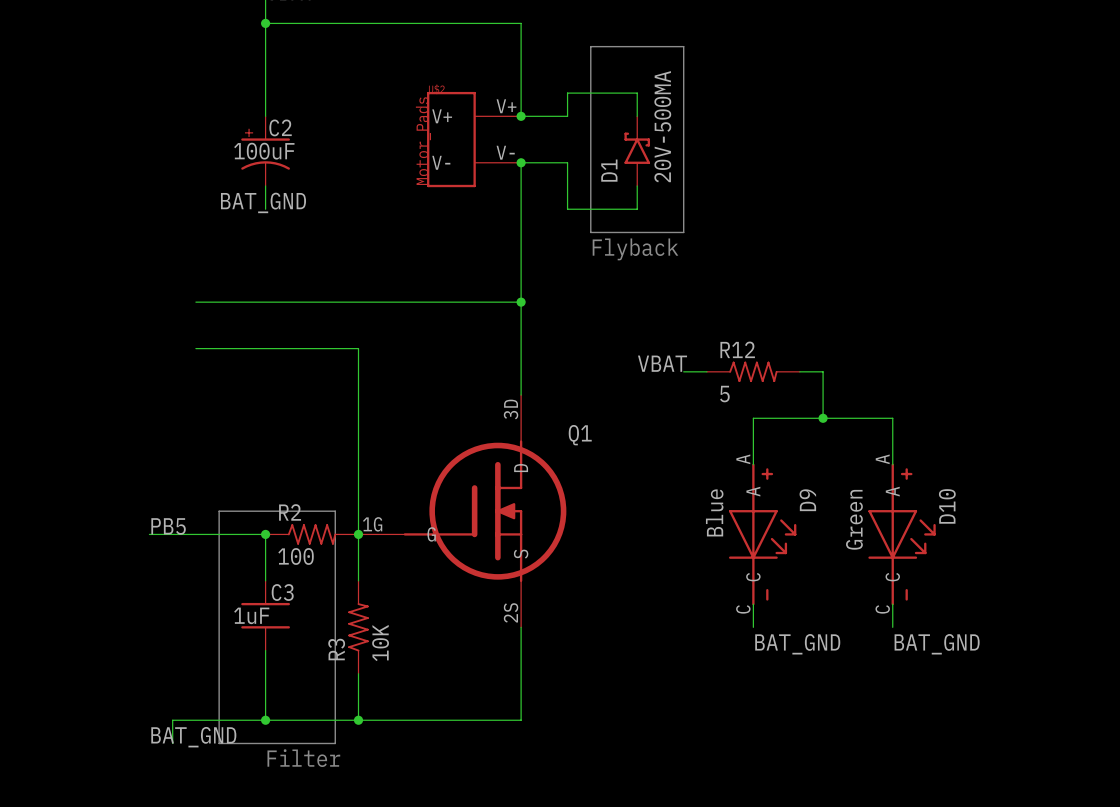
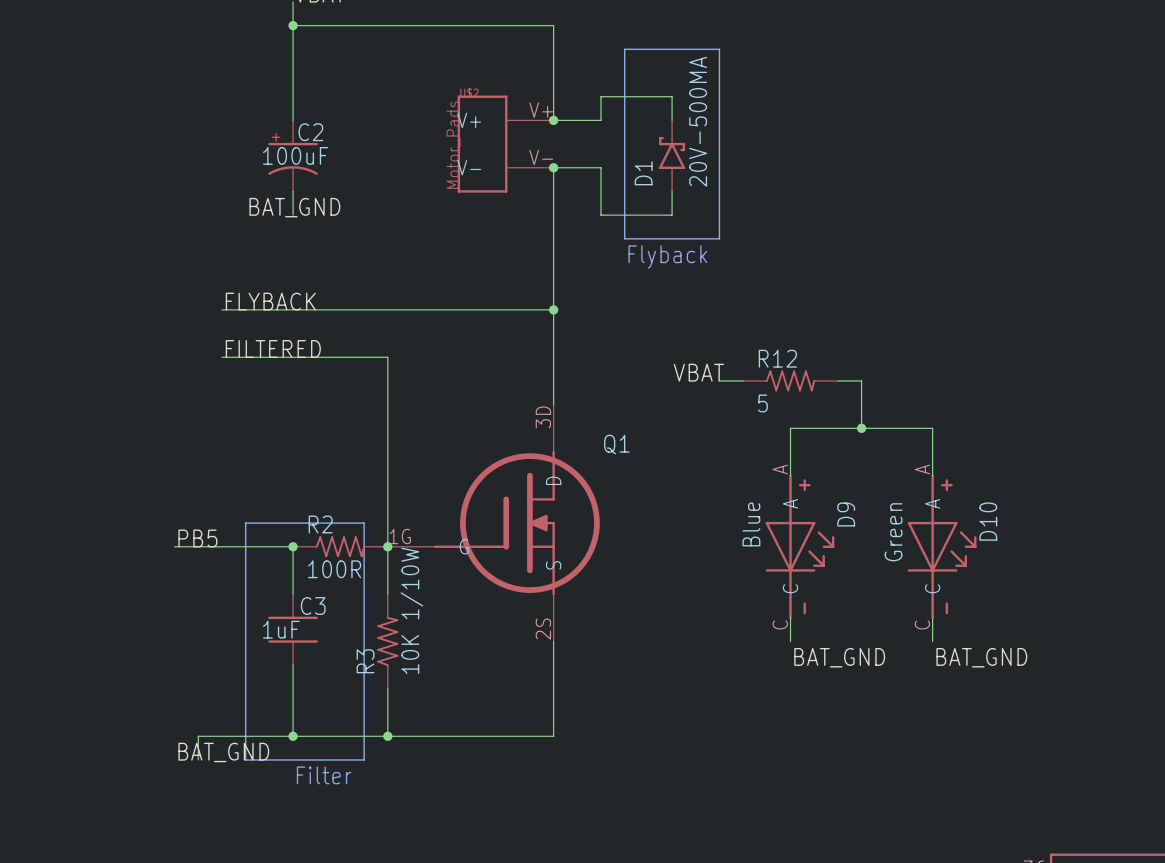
label: none -> FLYBACK (270, 301)
label: none -> FILTERED (273, 348)
R2 value: 100 (296, 556) -> 100R (334, 569)
R3 value: 10K (380, 642) -> 10K 1/10W (411, 610)

